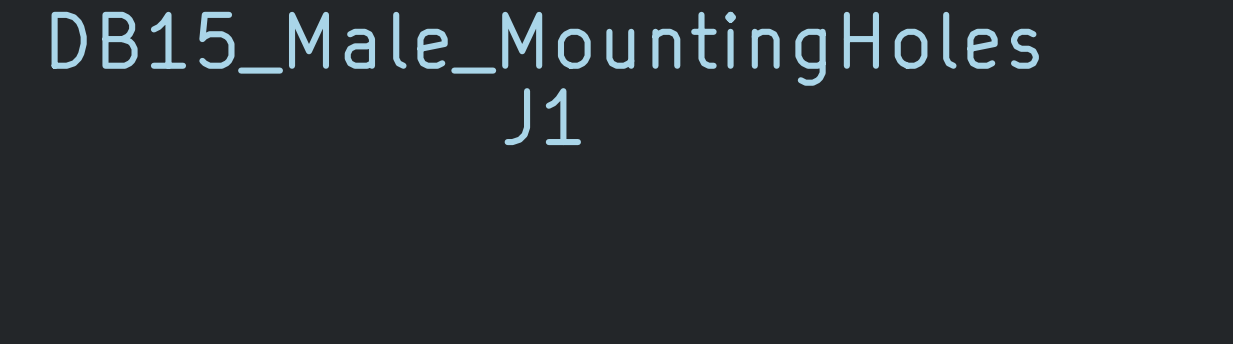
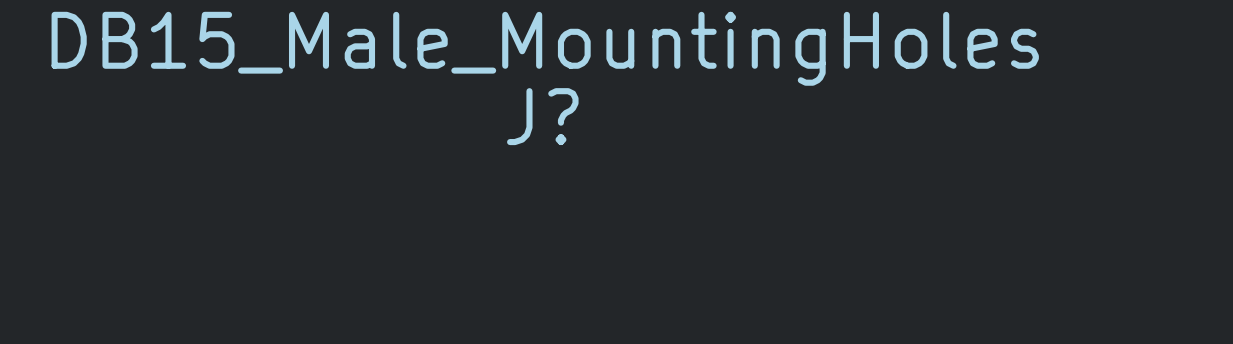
J1 name: J1 (542, 116) -> J? (542, 116)

